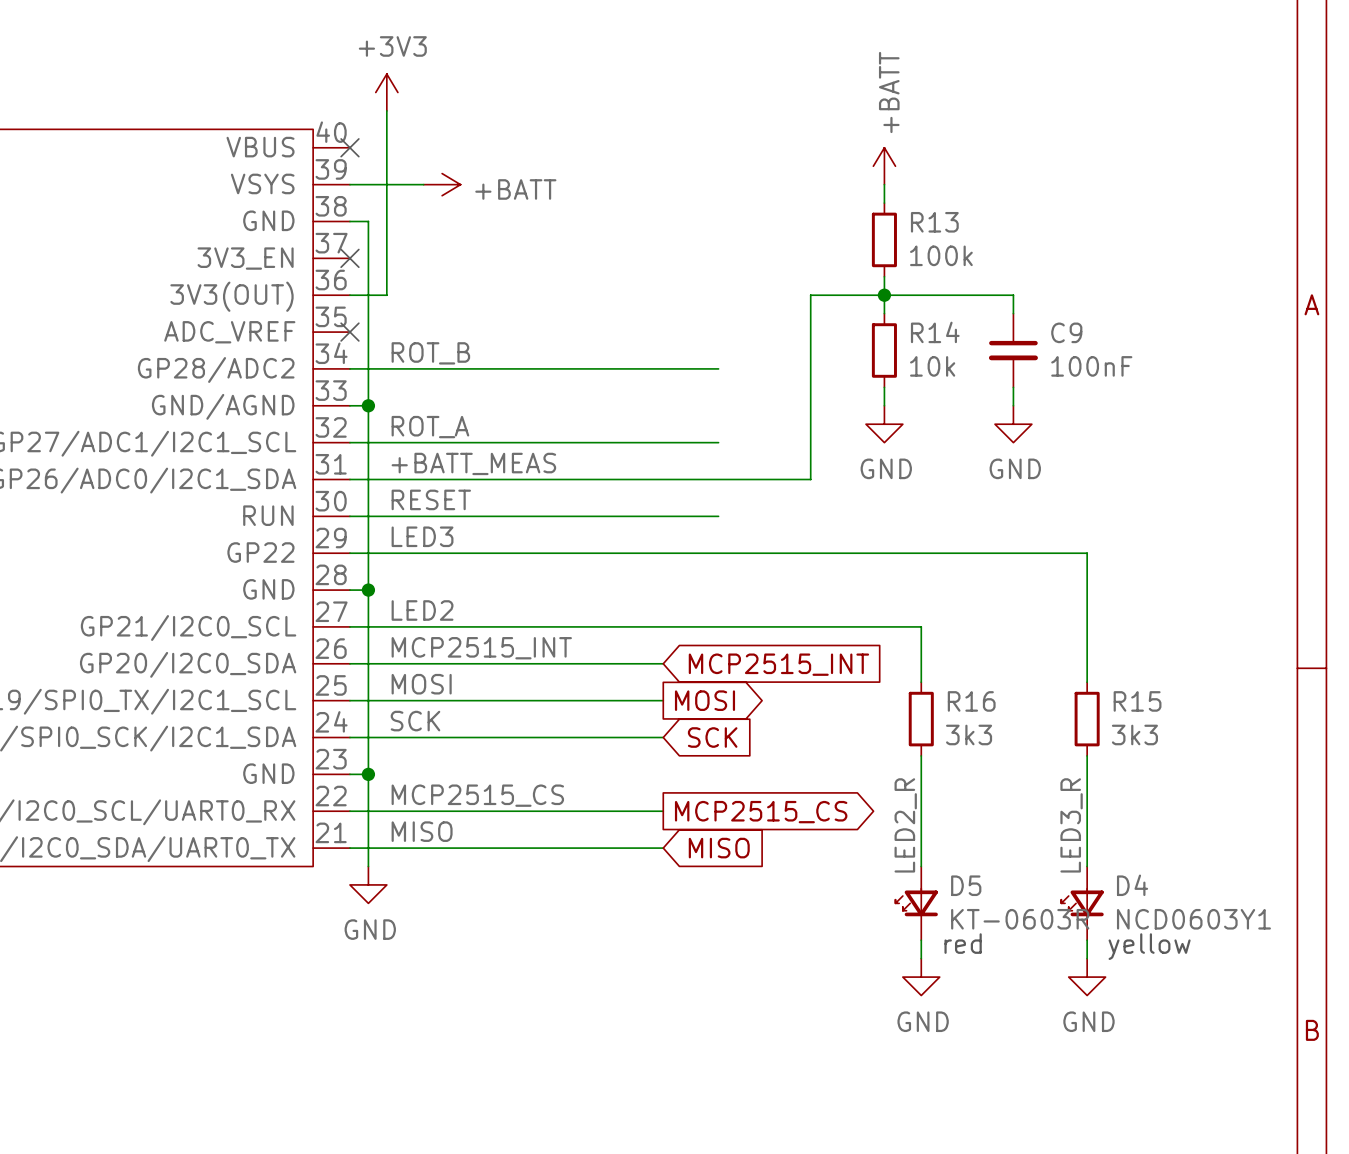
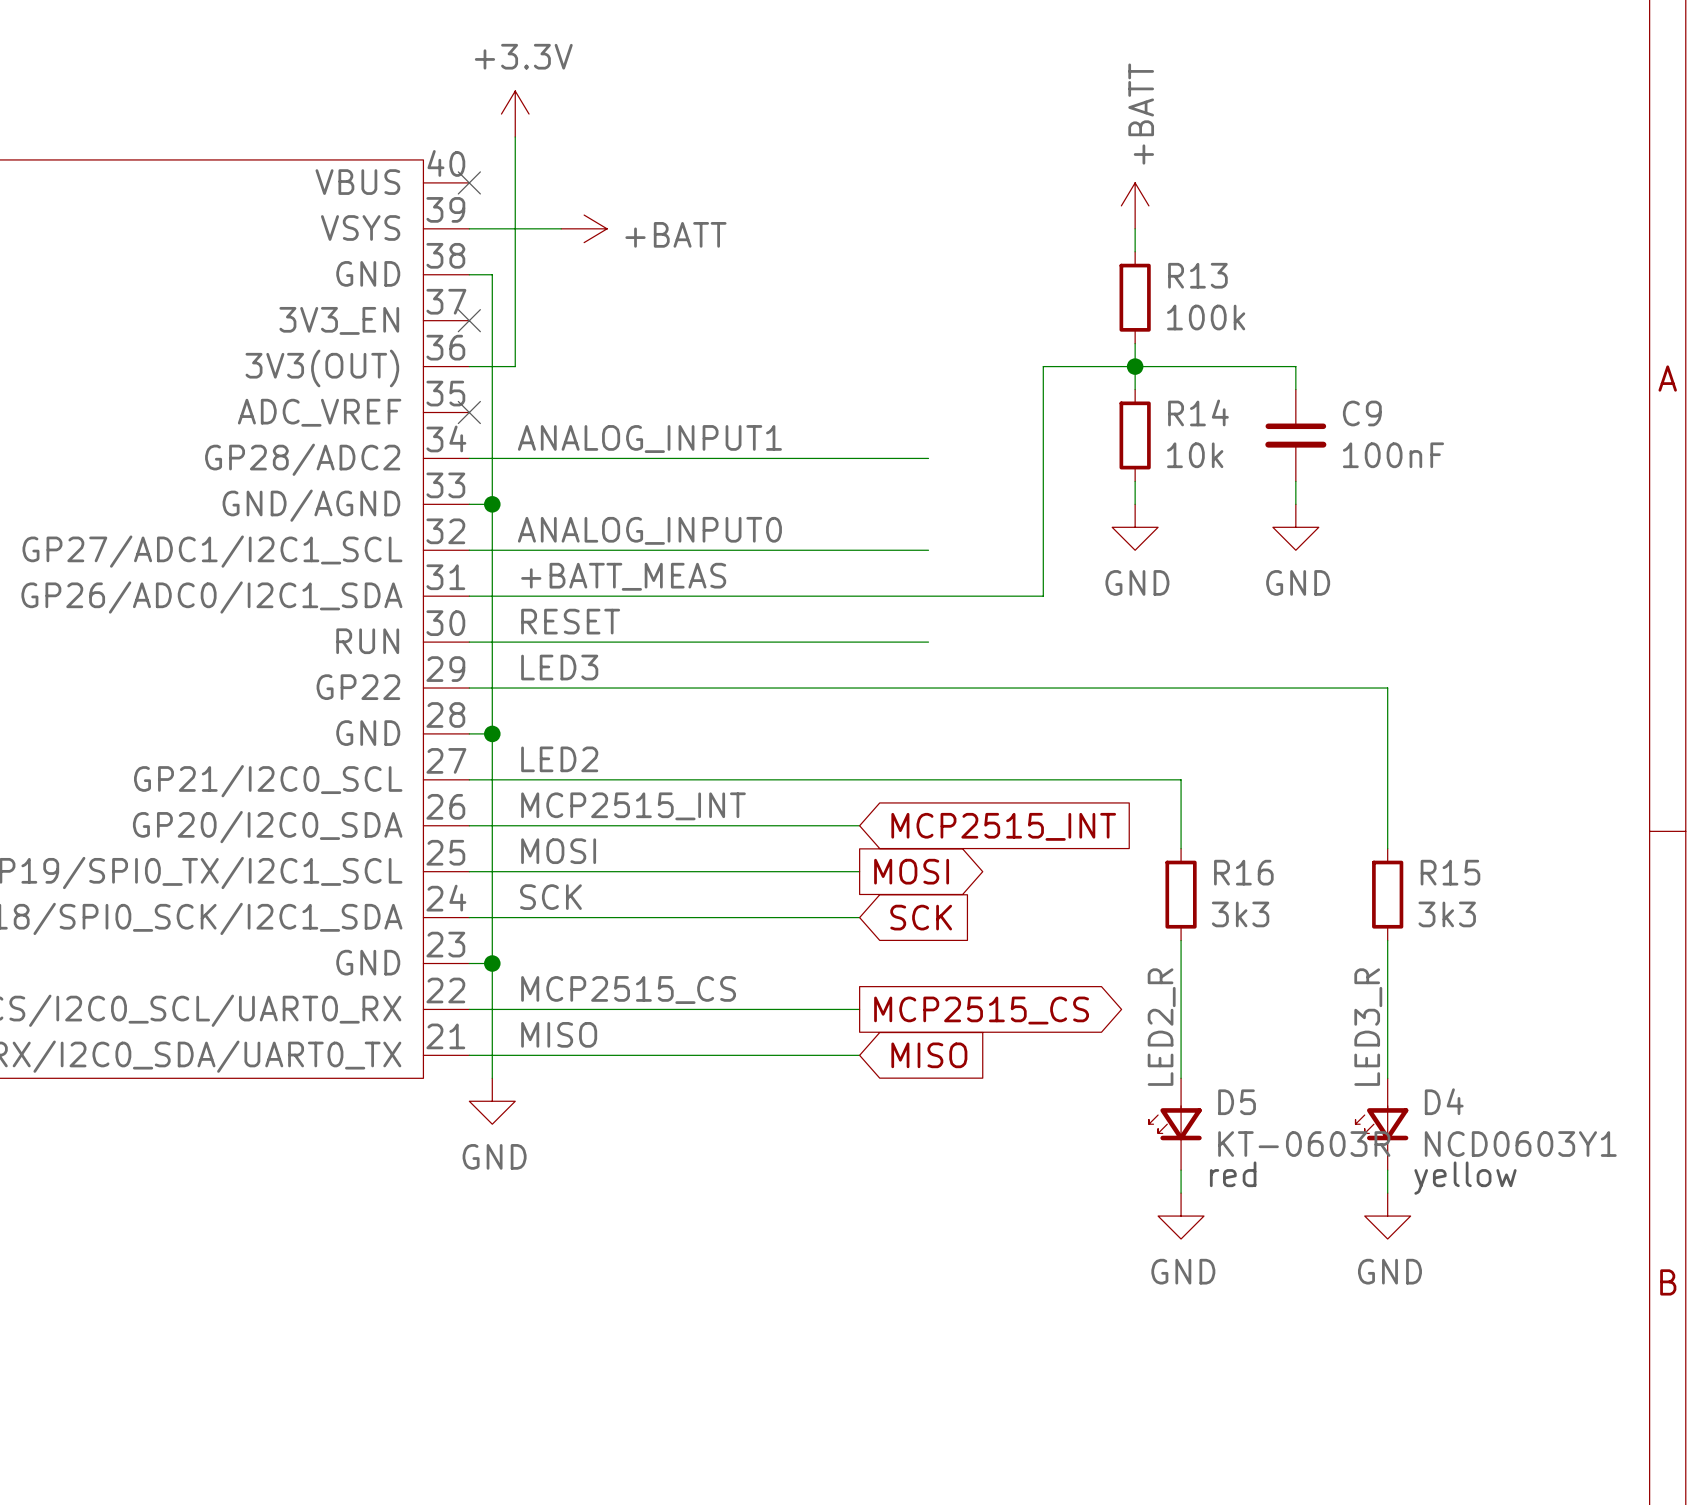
power symbol: +3V3 (386, 92) -> +3.3V (515, 114)
label: ROT_B (430, 353) -> ANALOG_INPUT1 (649, 439)
label: ROT_A (430, 427) -> ANALOG_INPUT0 (649, 530)

